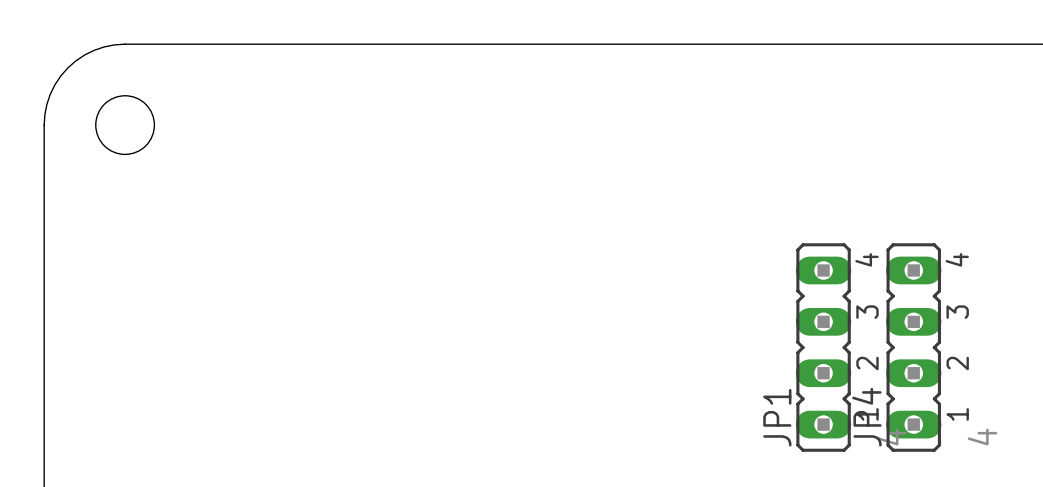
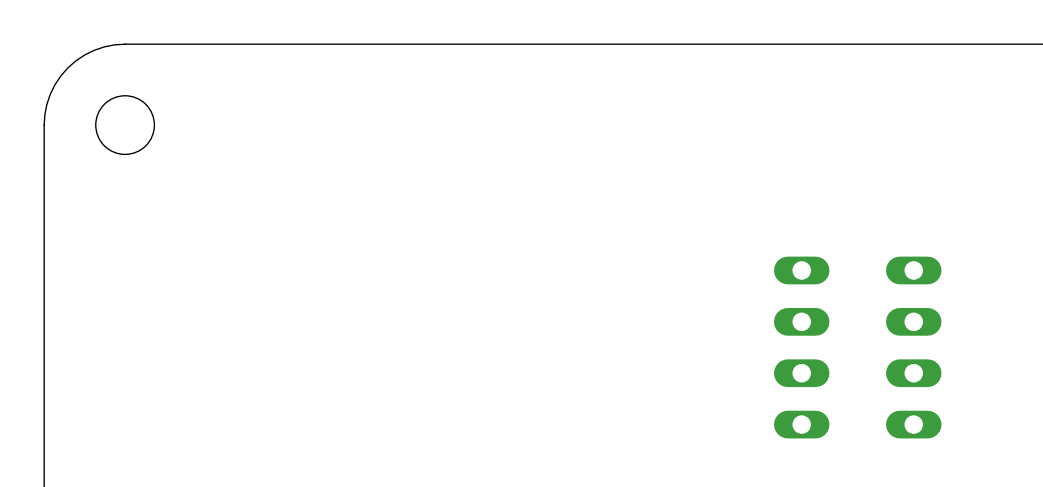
JP1 side: top (823, 347) -> bottom (801, 347)
JP4: 4 (913, 347) -> none
part: none -> (913, 347)

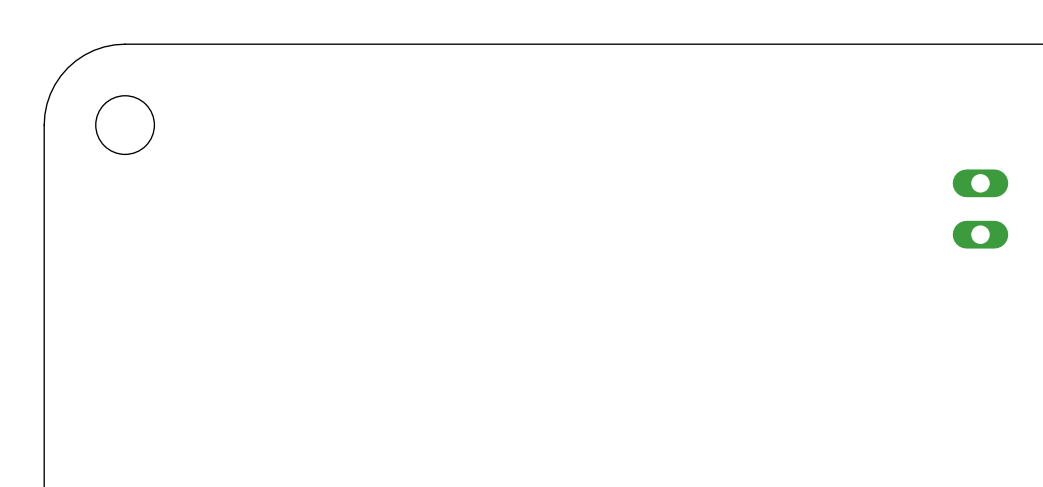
part: none -> (980, 209)
part: (801, 347) -> none
part: (913, 347) -> none

